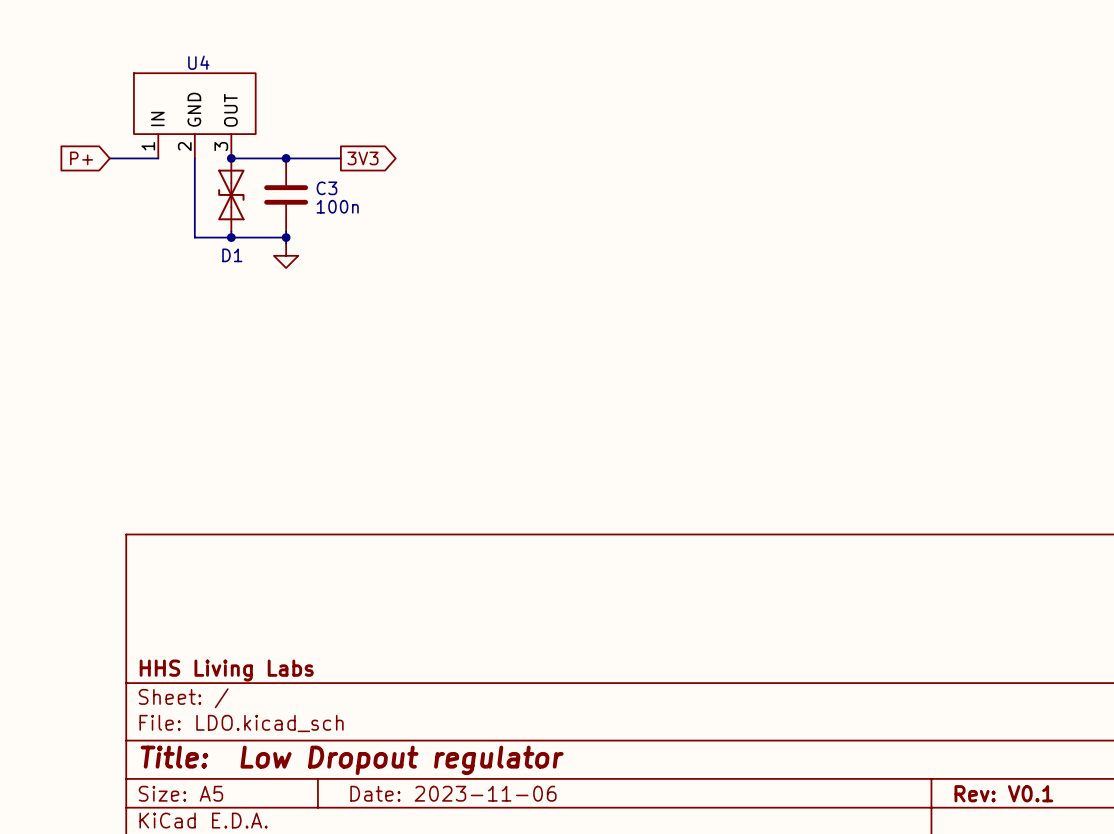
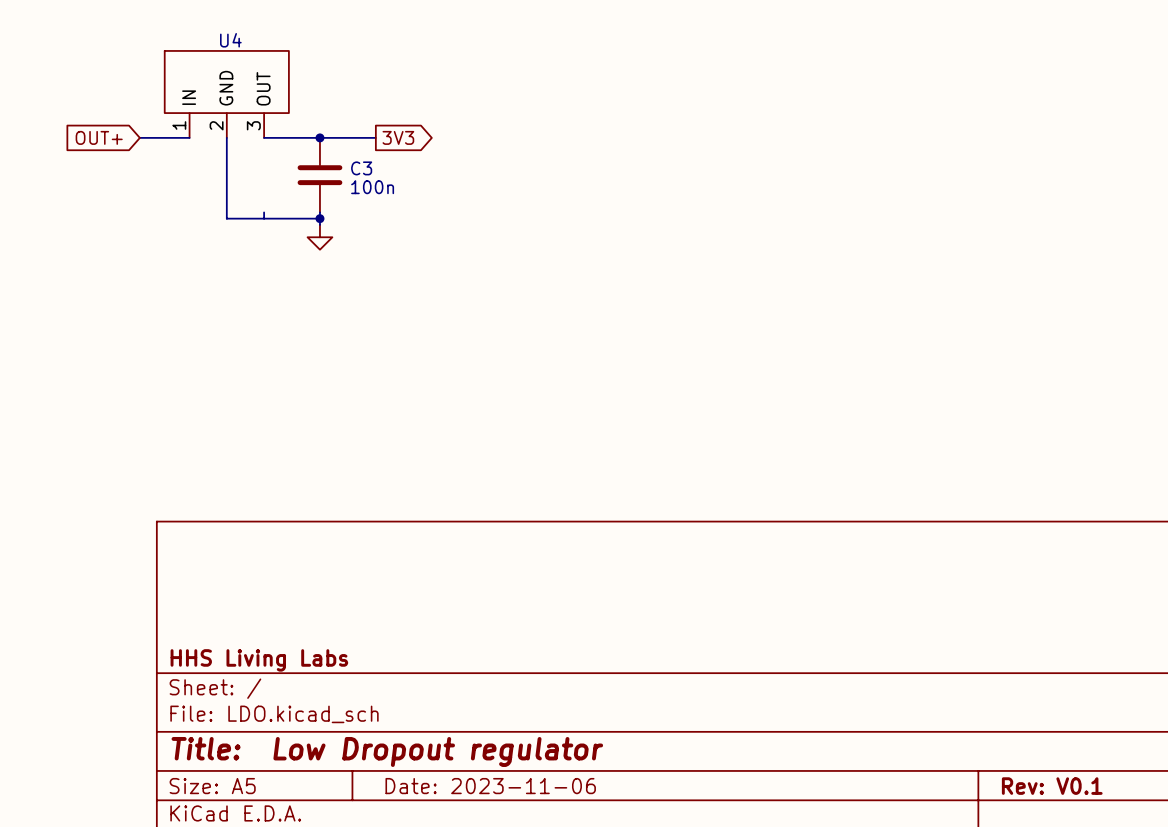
global label: P+ (81, 158) -> OUT+ (99, 137)
junction: (231, 158) -> none
D1: (231, 194) -> none
junction: (231, 237) -> none

